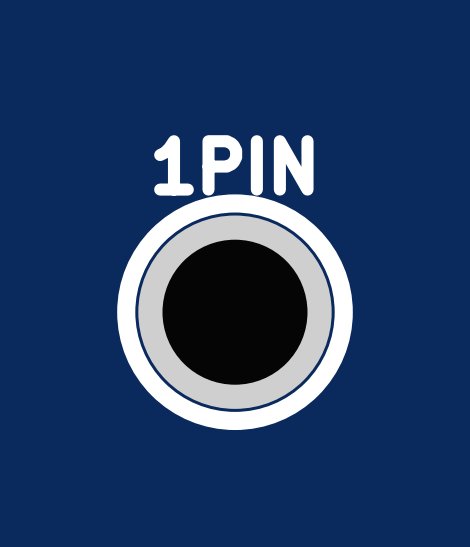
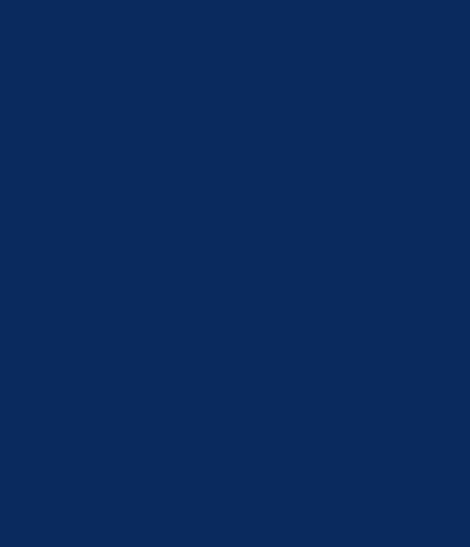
1PIN: (234, 312) -> none

